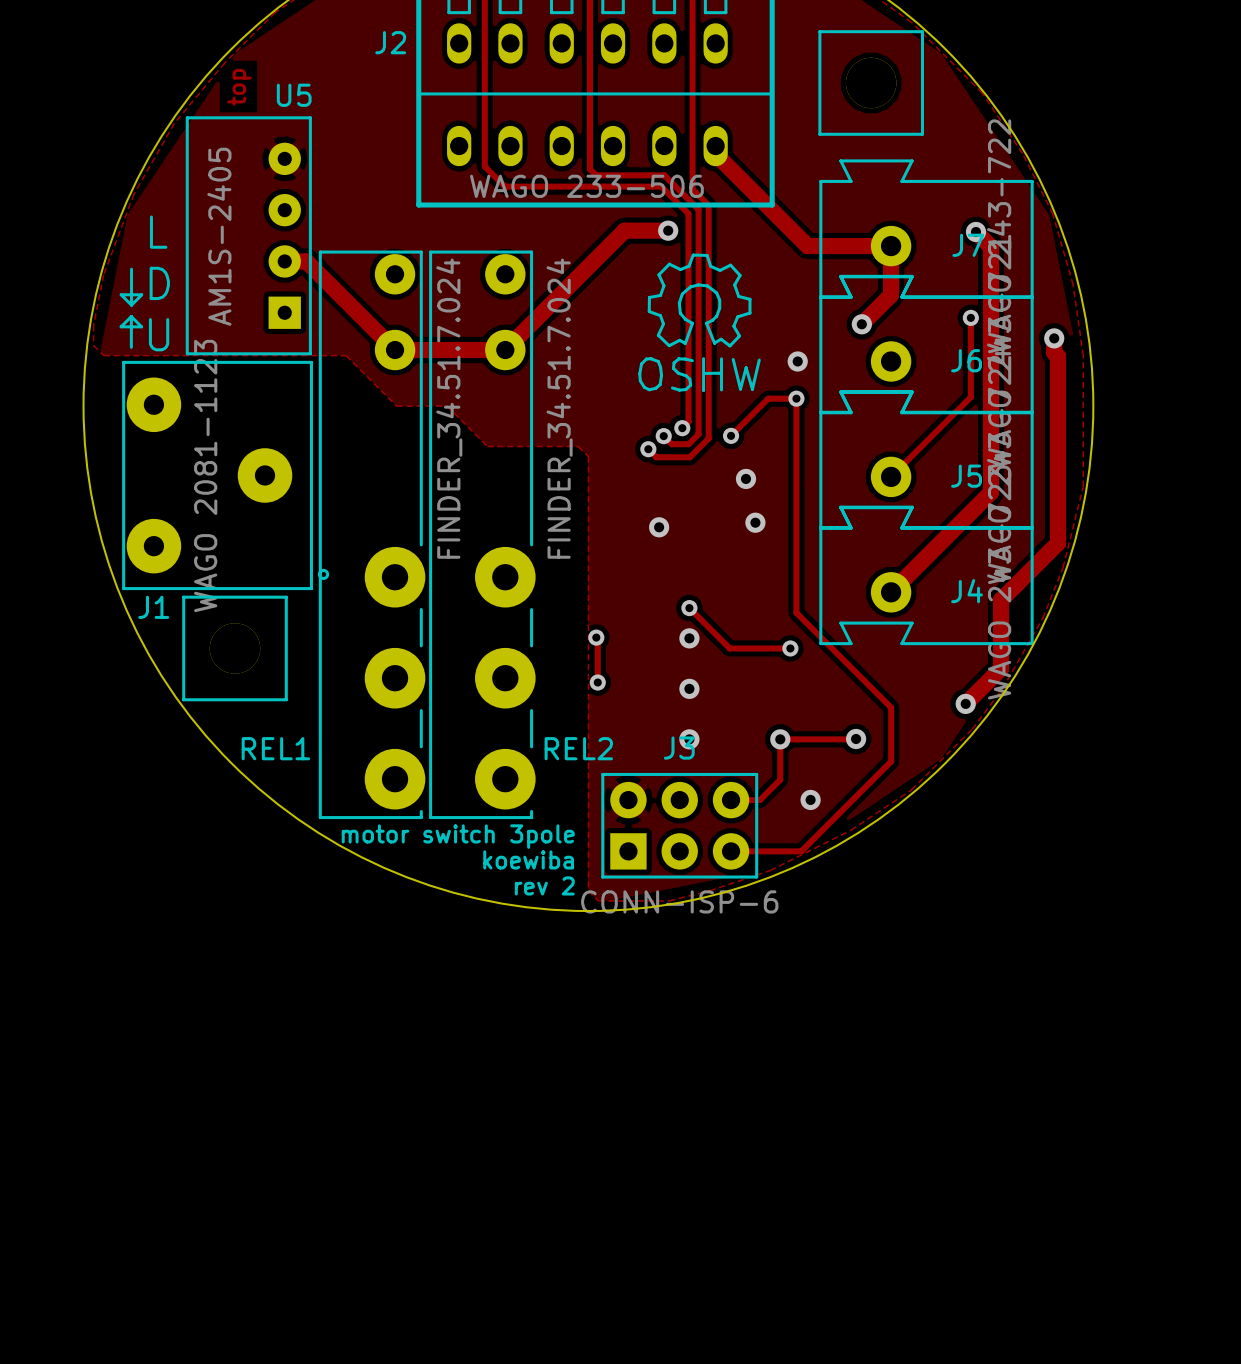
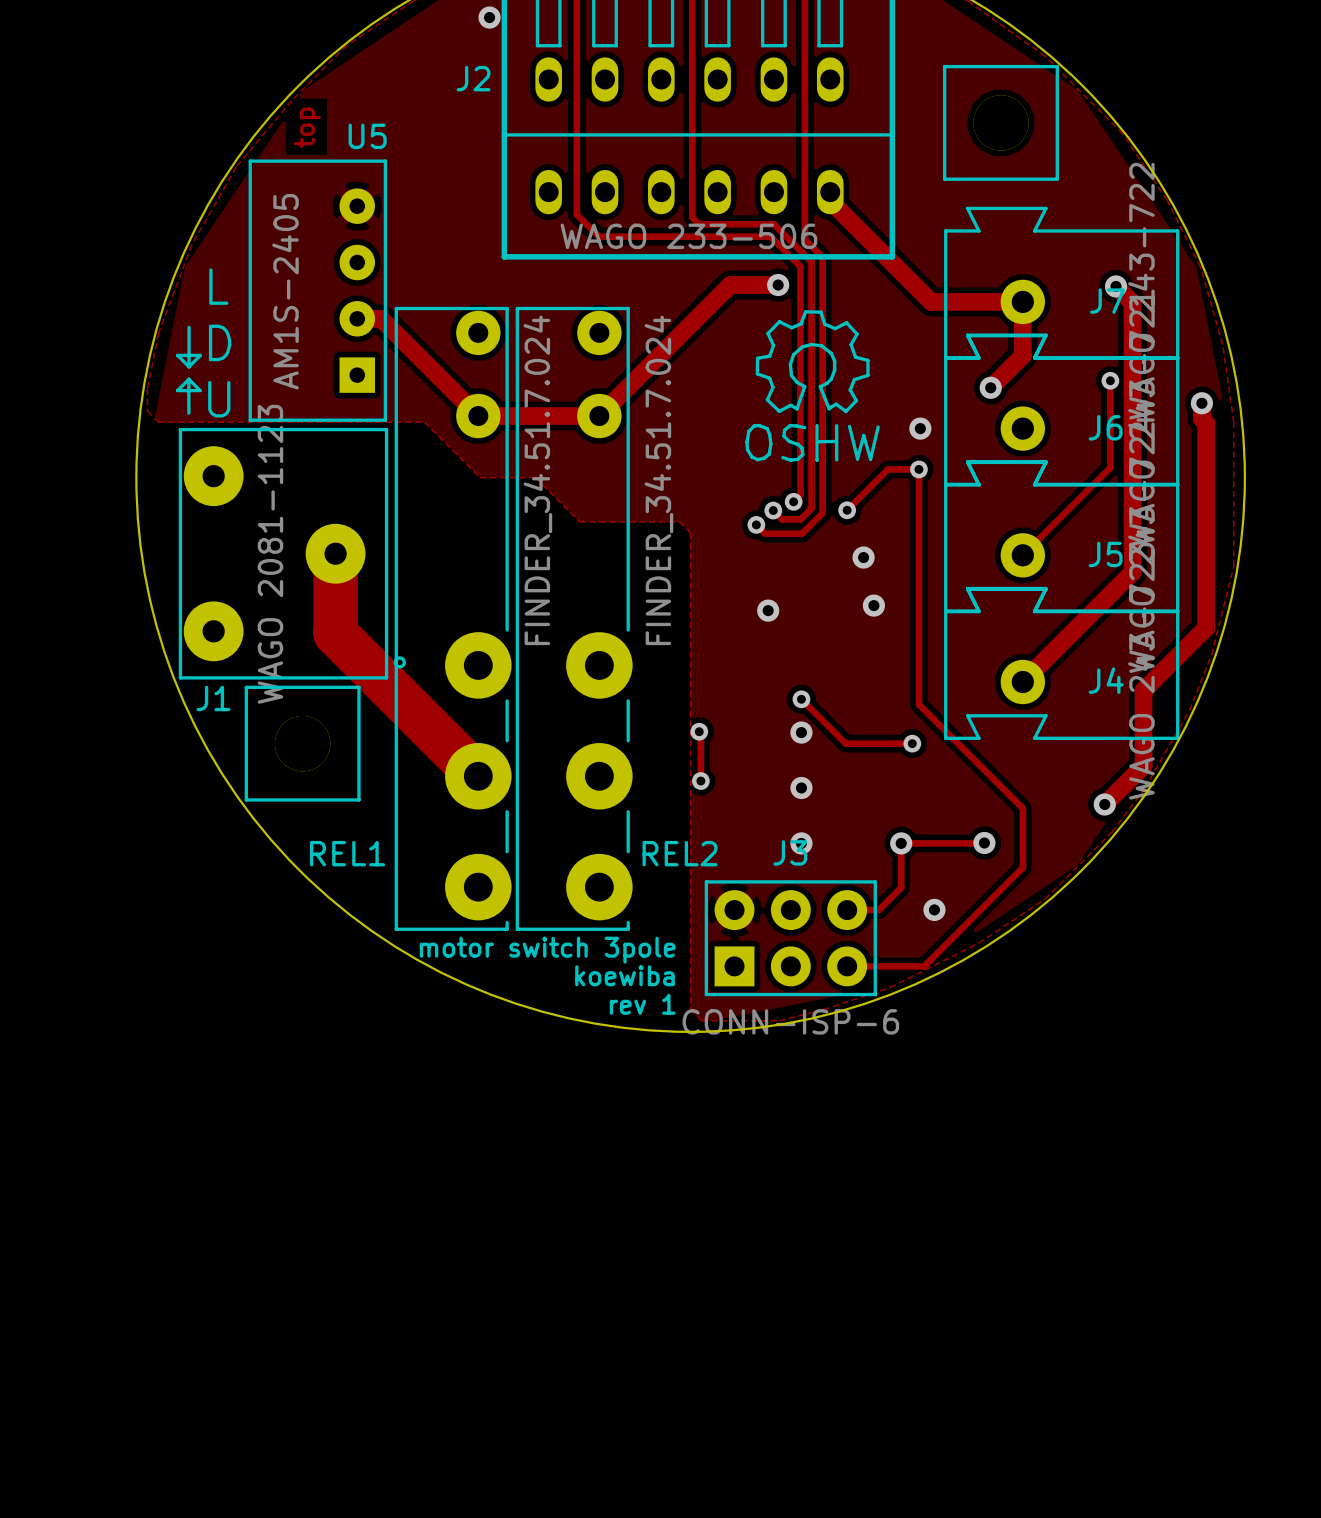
track: none -> (335, 553) (335, 633) (478, 776)
text: rev 2 (544, 885) -> rev 1 (642, 1004)

